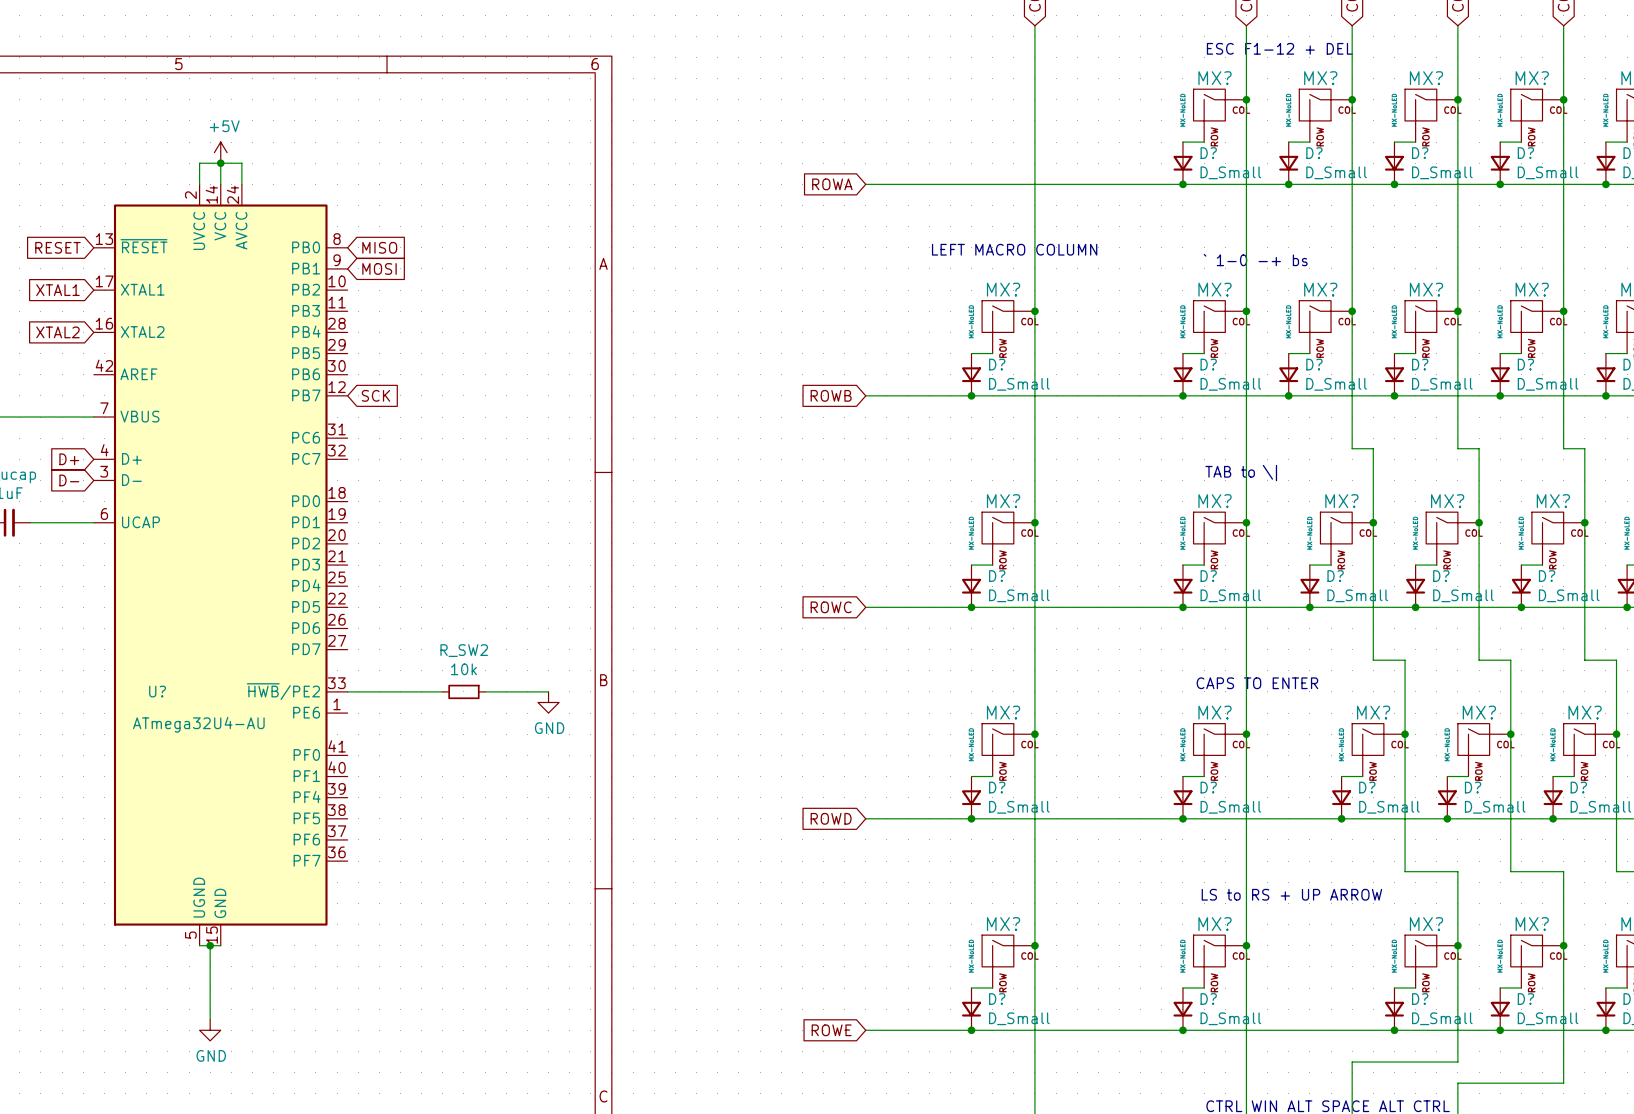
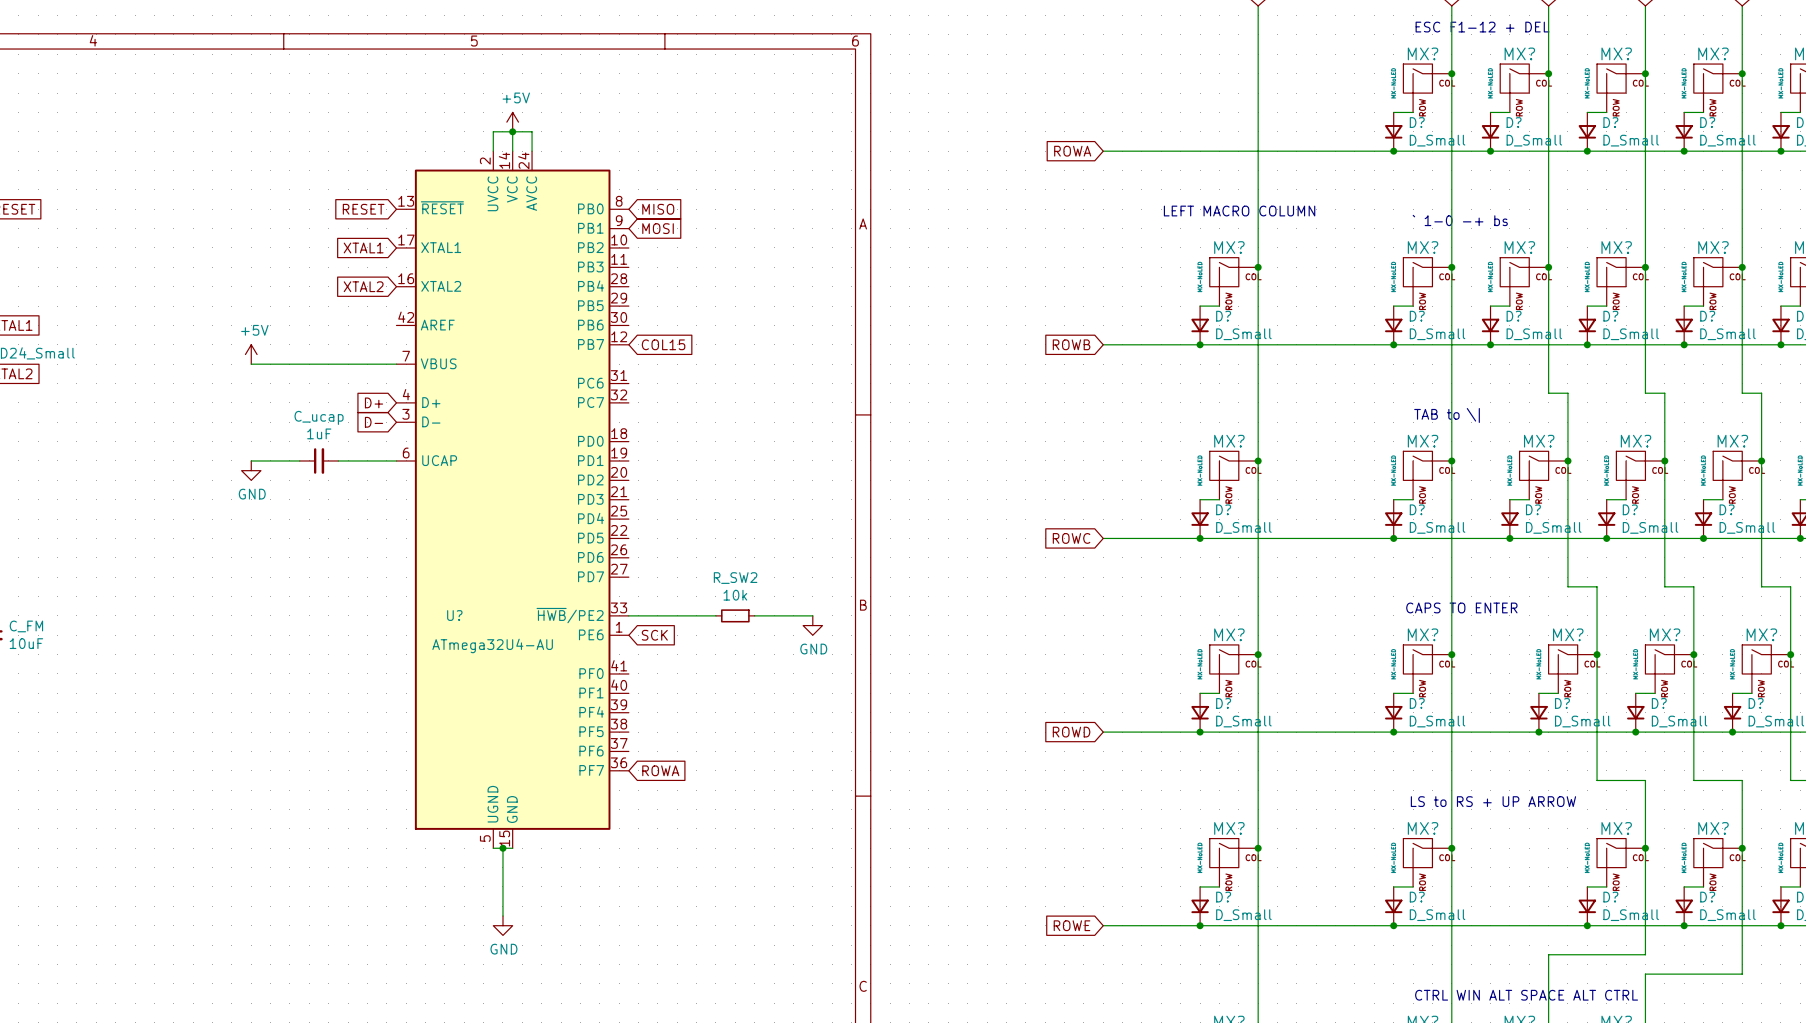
global label: SCK (375, 395) -> COL15 (663, 344)
global label: none -> SCK (654, 635)
global label: none -> ROWA (660, 770)

